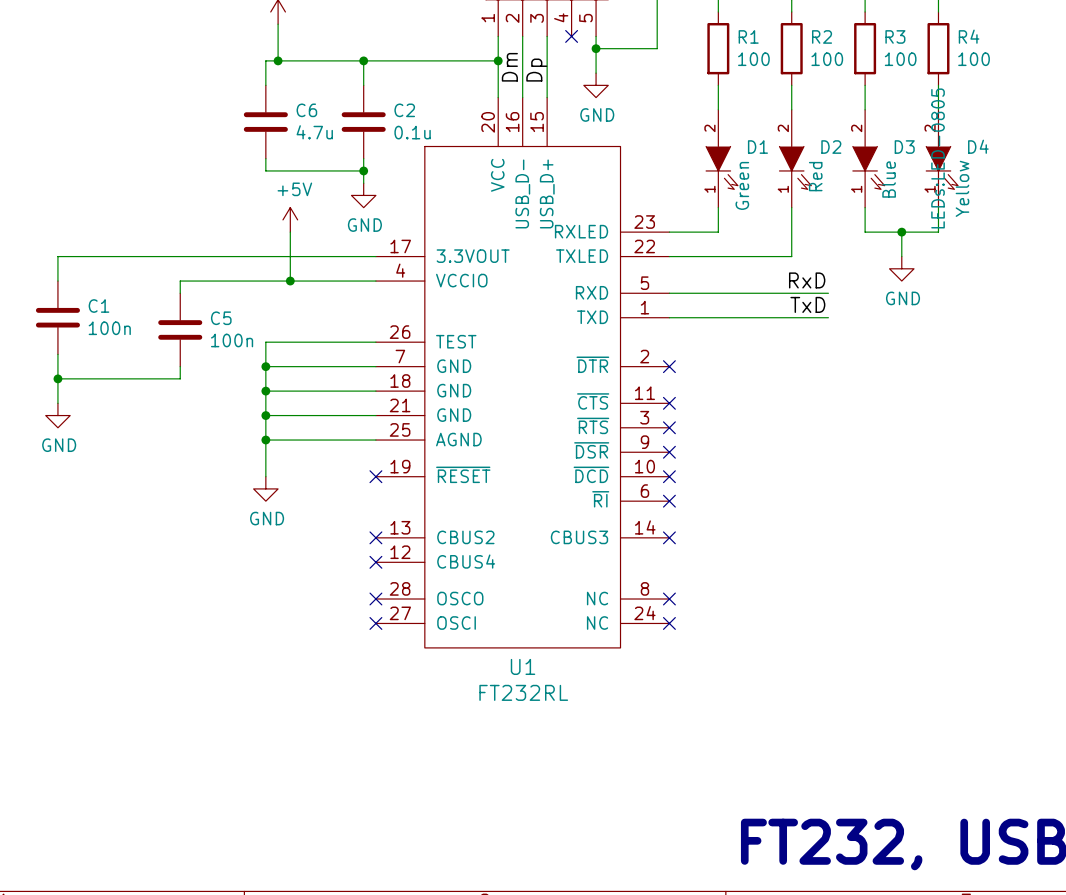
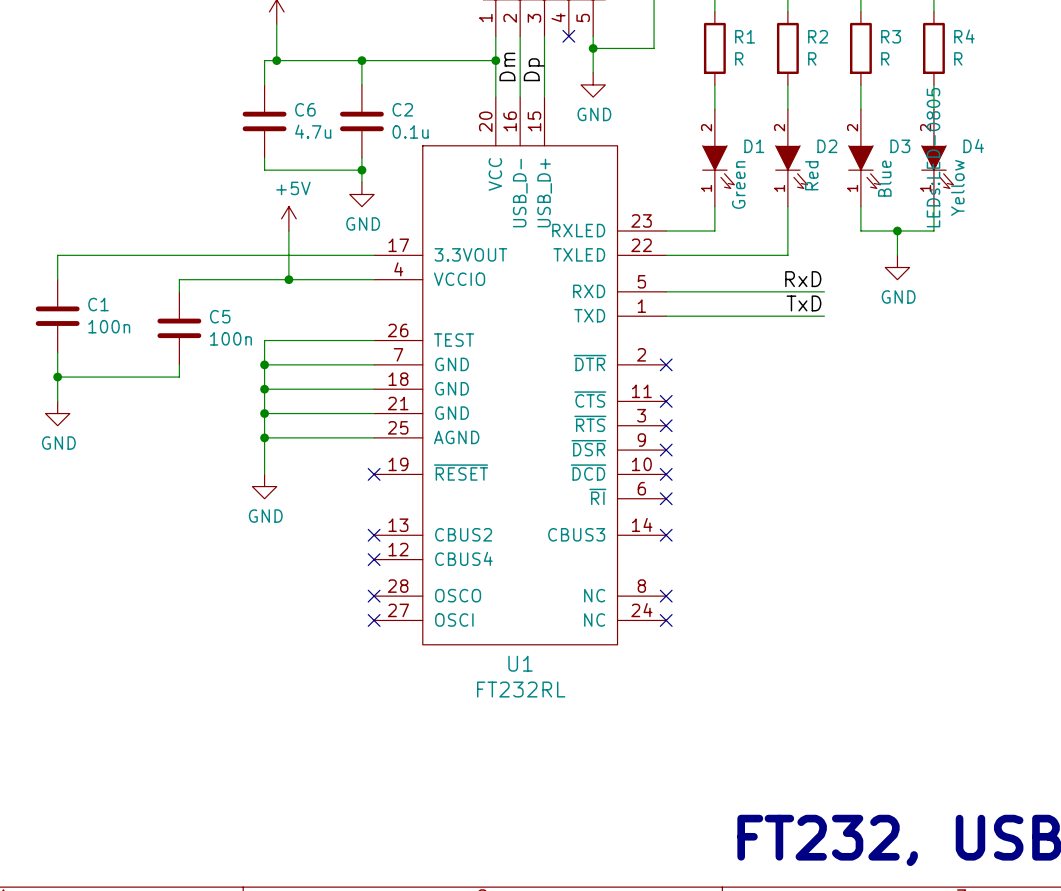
R1 value: 100 (753, 59) -> R (739, 58)
R2 value: 100 (827, 59) -> R (812, 58)
R3 value: 100 (900, 59) -> R (885, 58)
R4 value: 100 (974, 59) -> R (958, 58)

